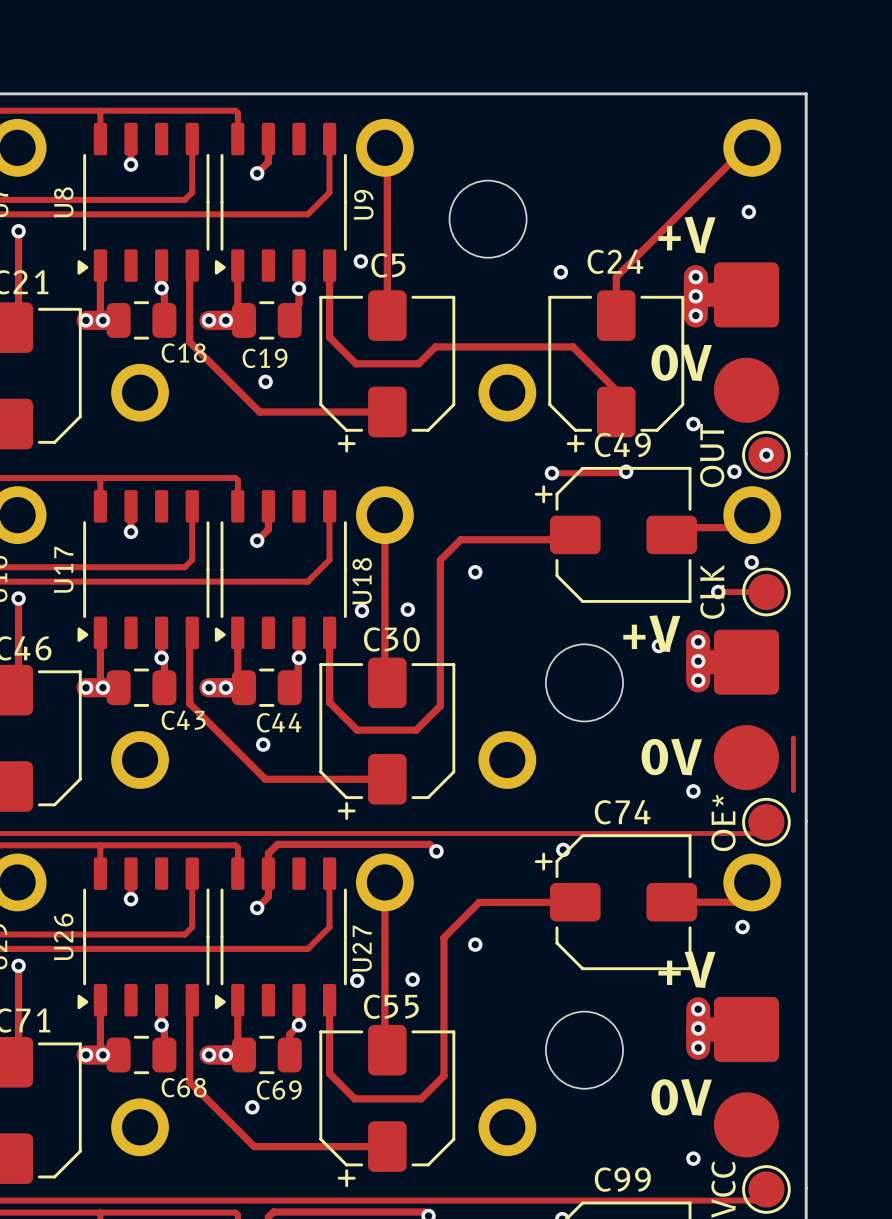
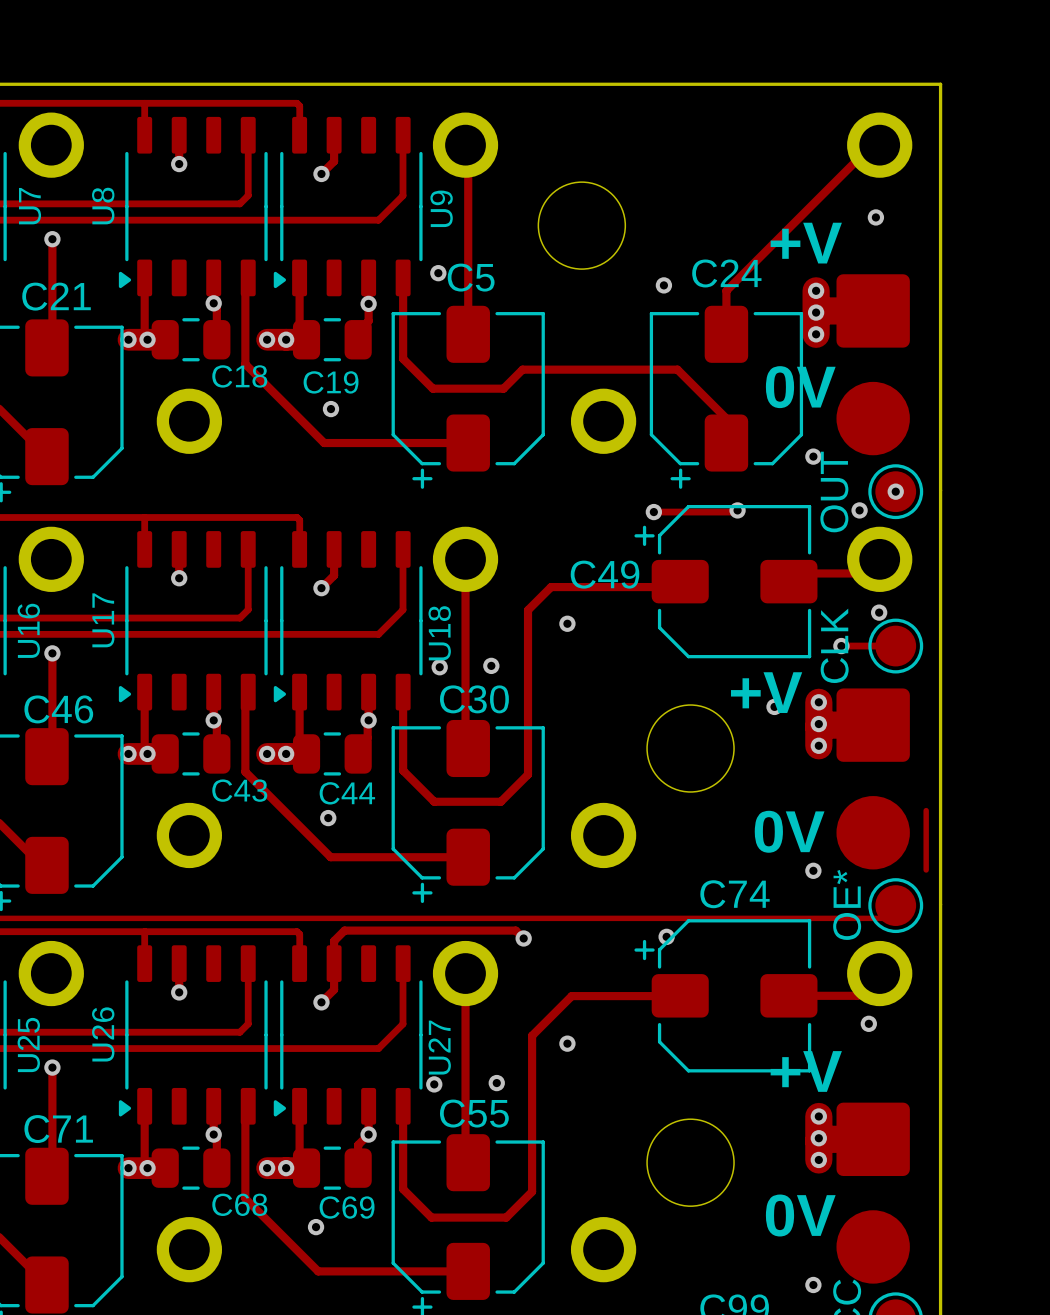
C49 name position: C49 (622, 444) -> C49 (605, 574)

